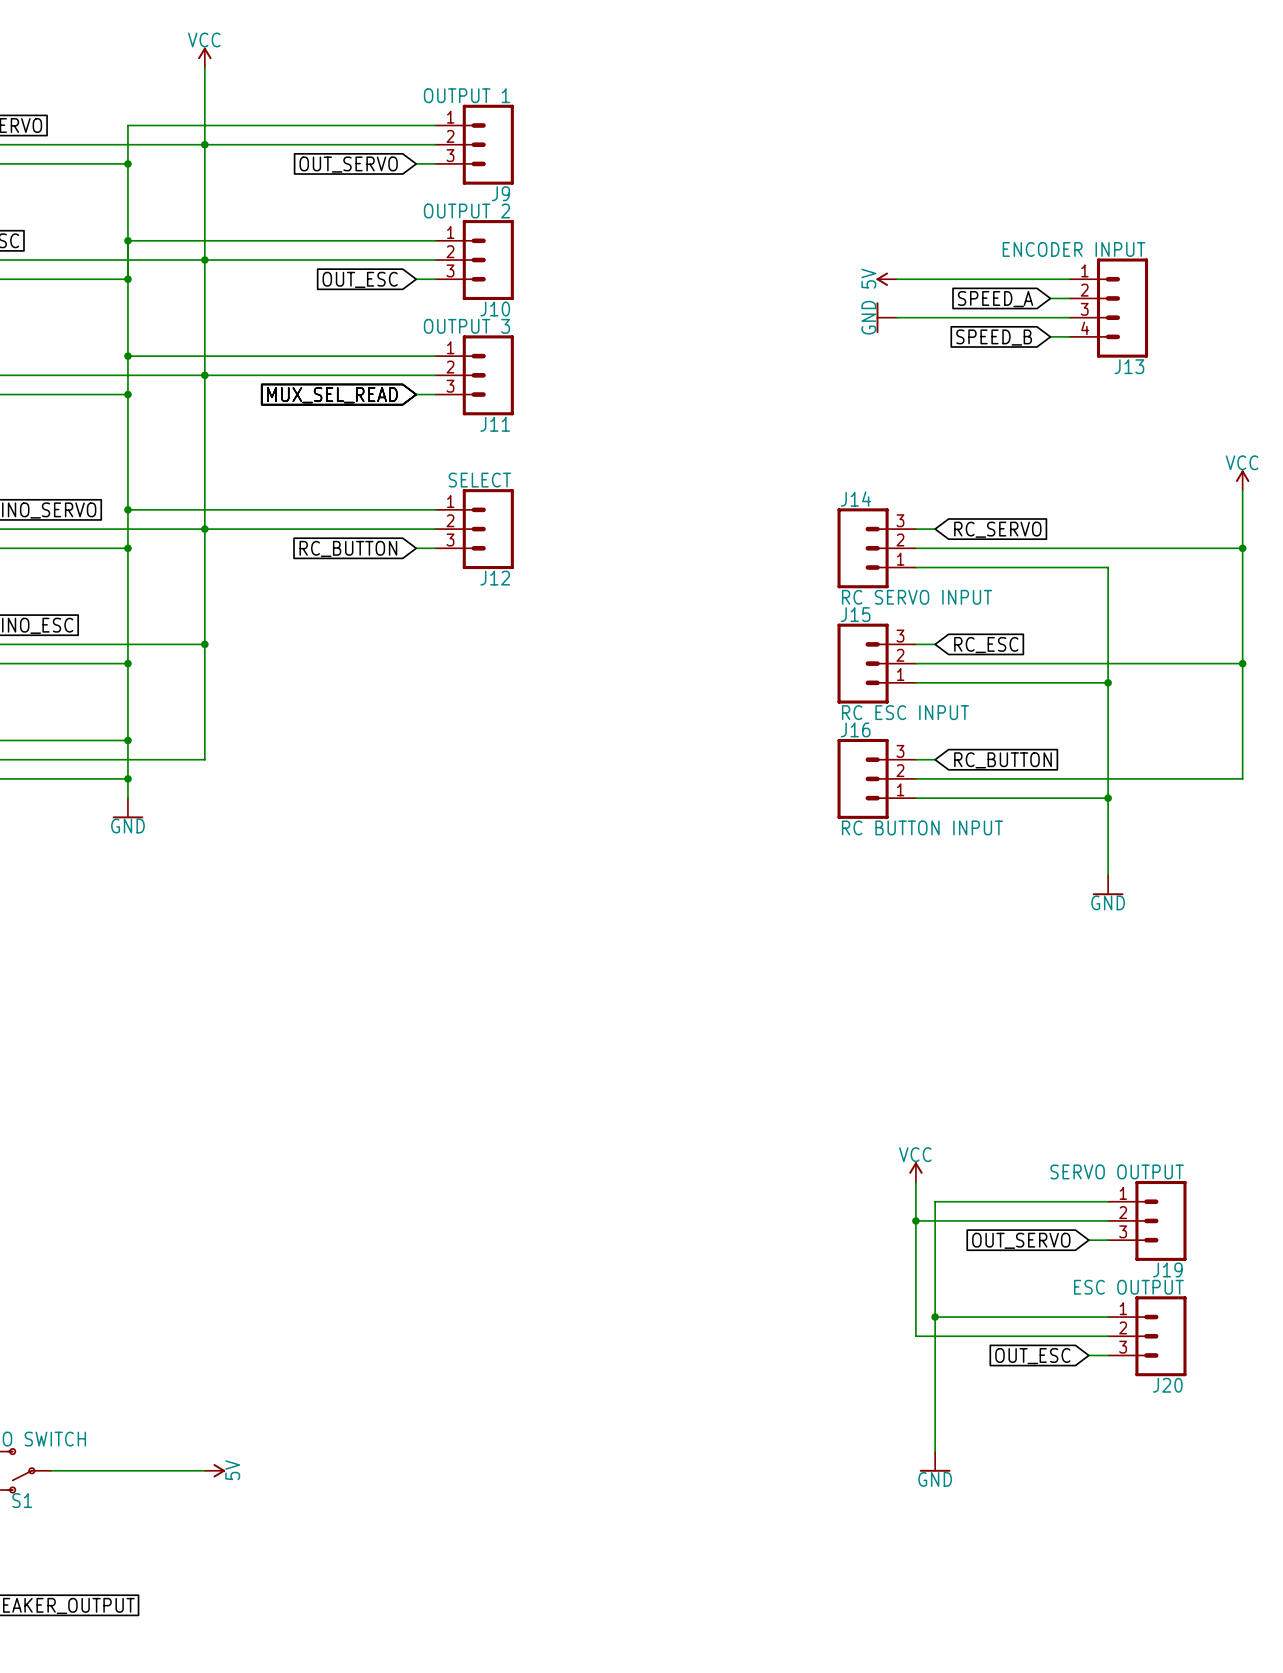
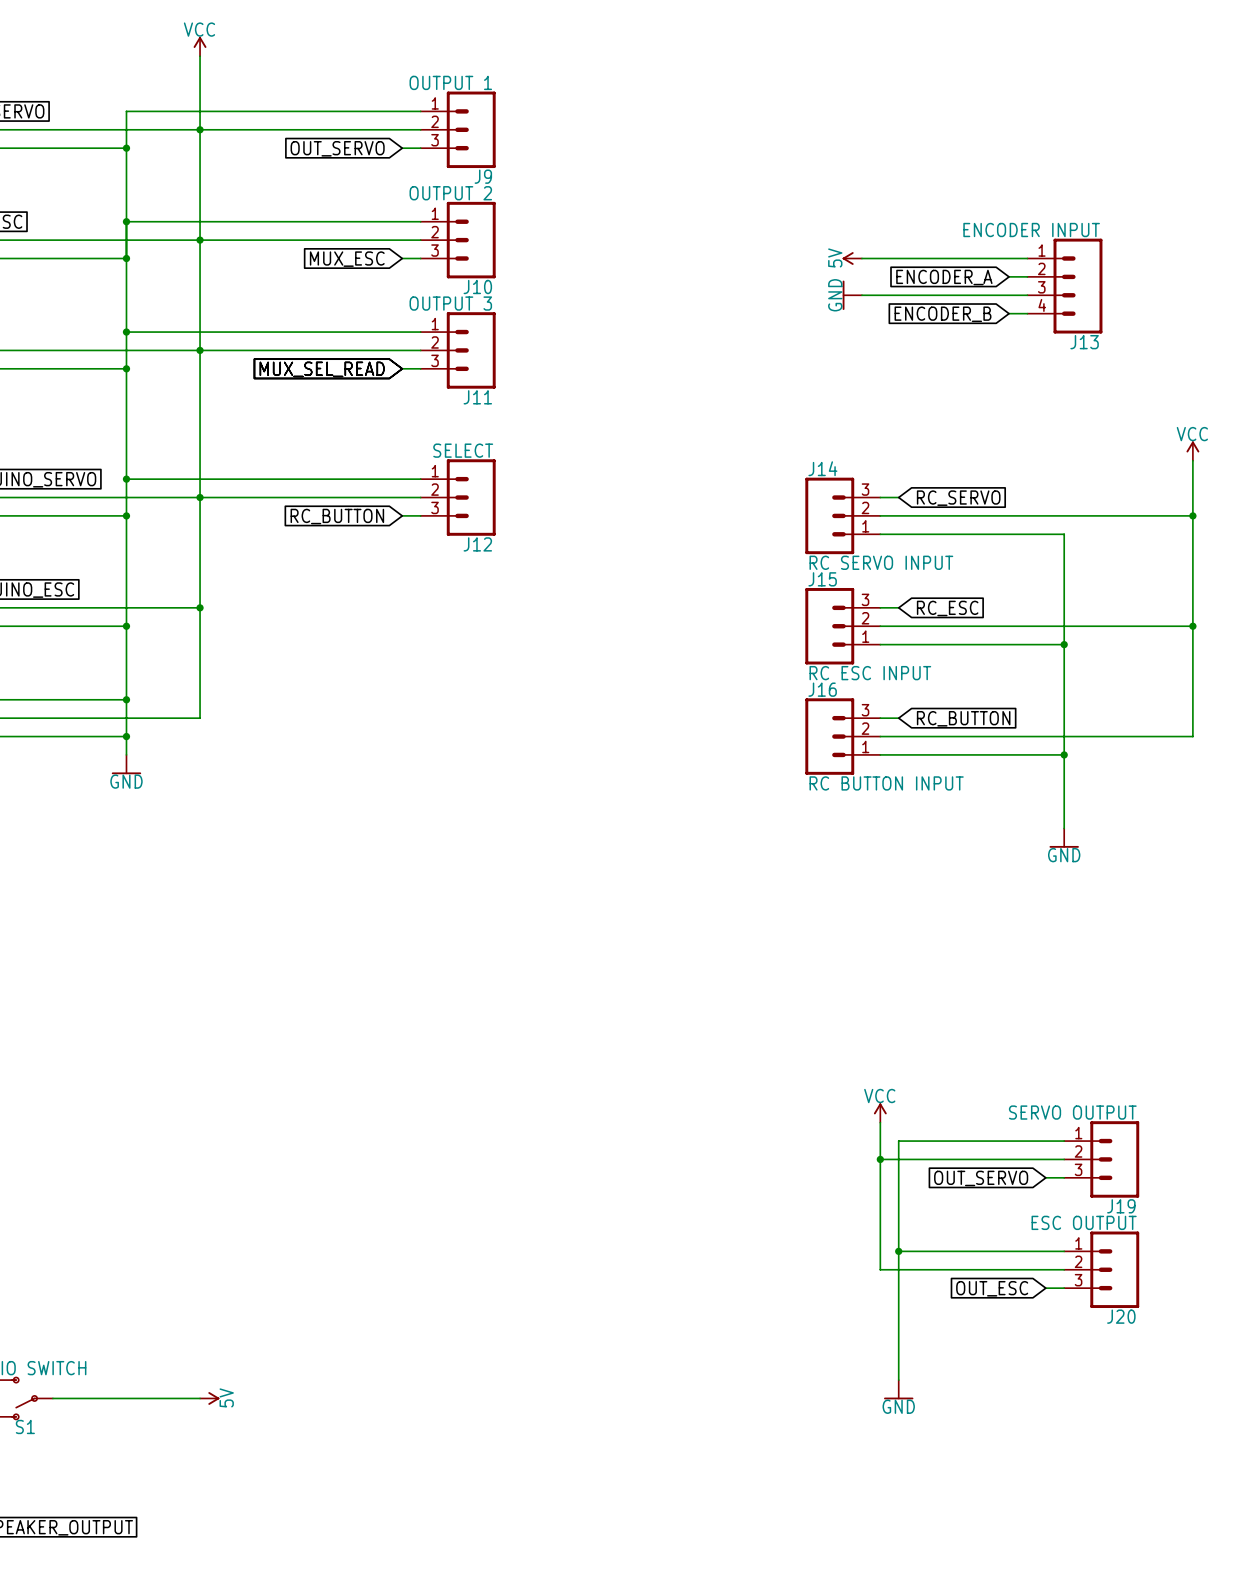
global label: OUT_ESC (360, 279) -> MUX_ESC (347, 259)
global label: SPEED_A (995, 299) -> ENCODER_A (944, 277)
global label: SPEED_B (994, 337) -> ENCODER_B (942, 314)

